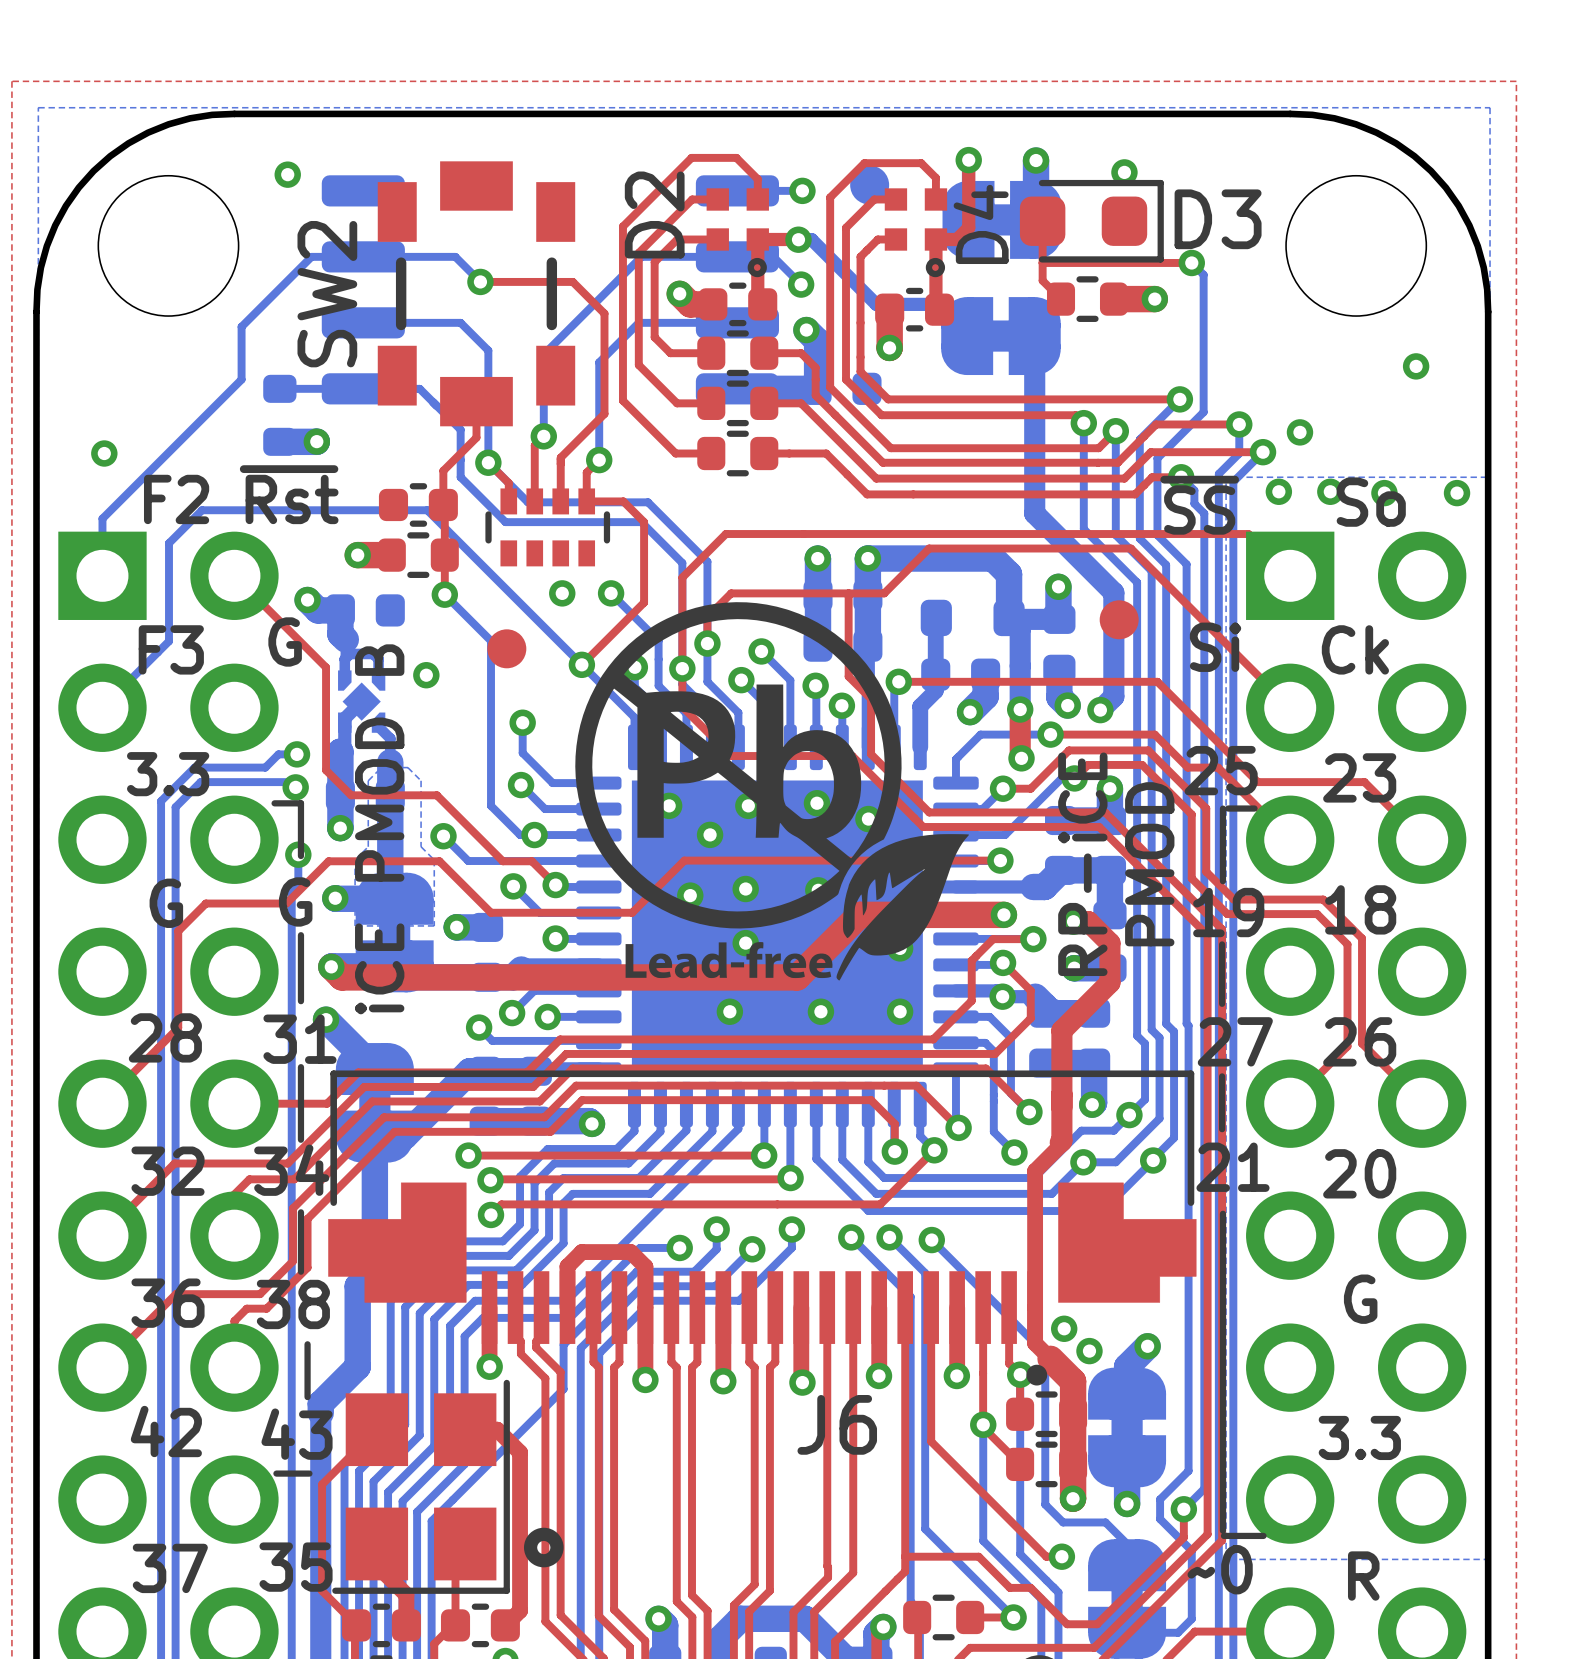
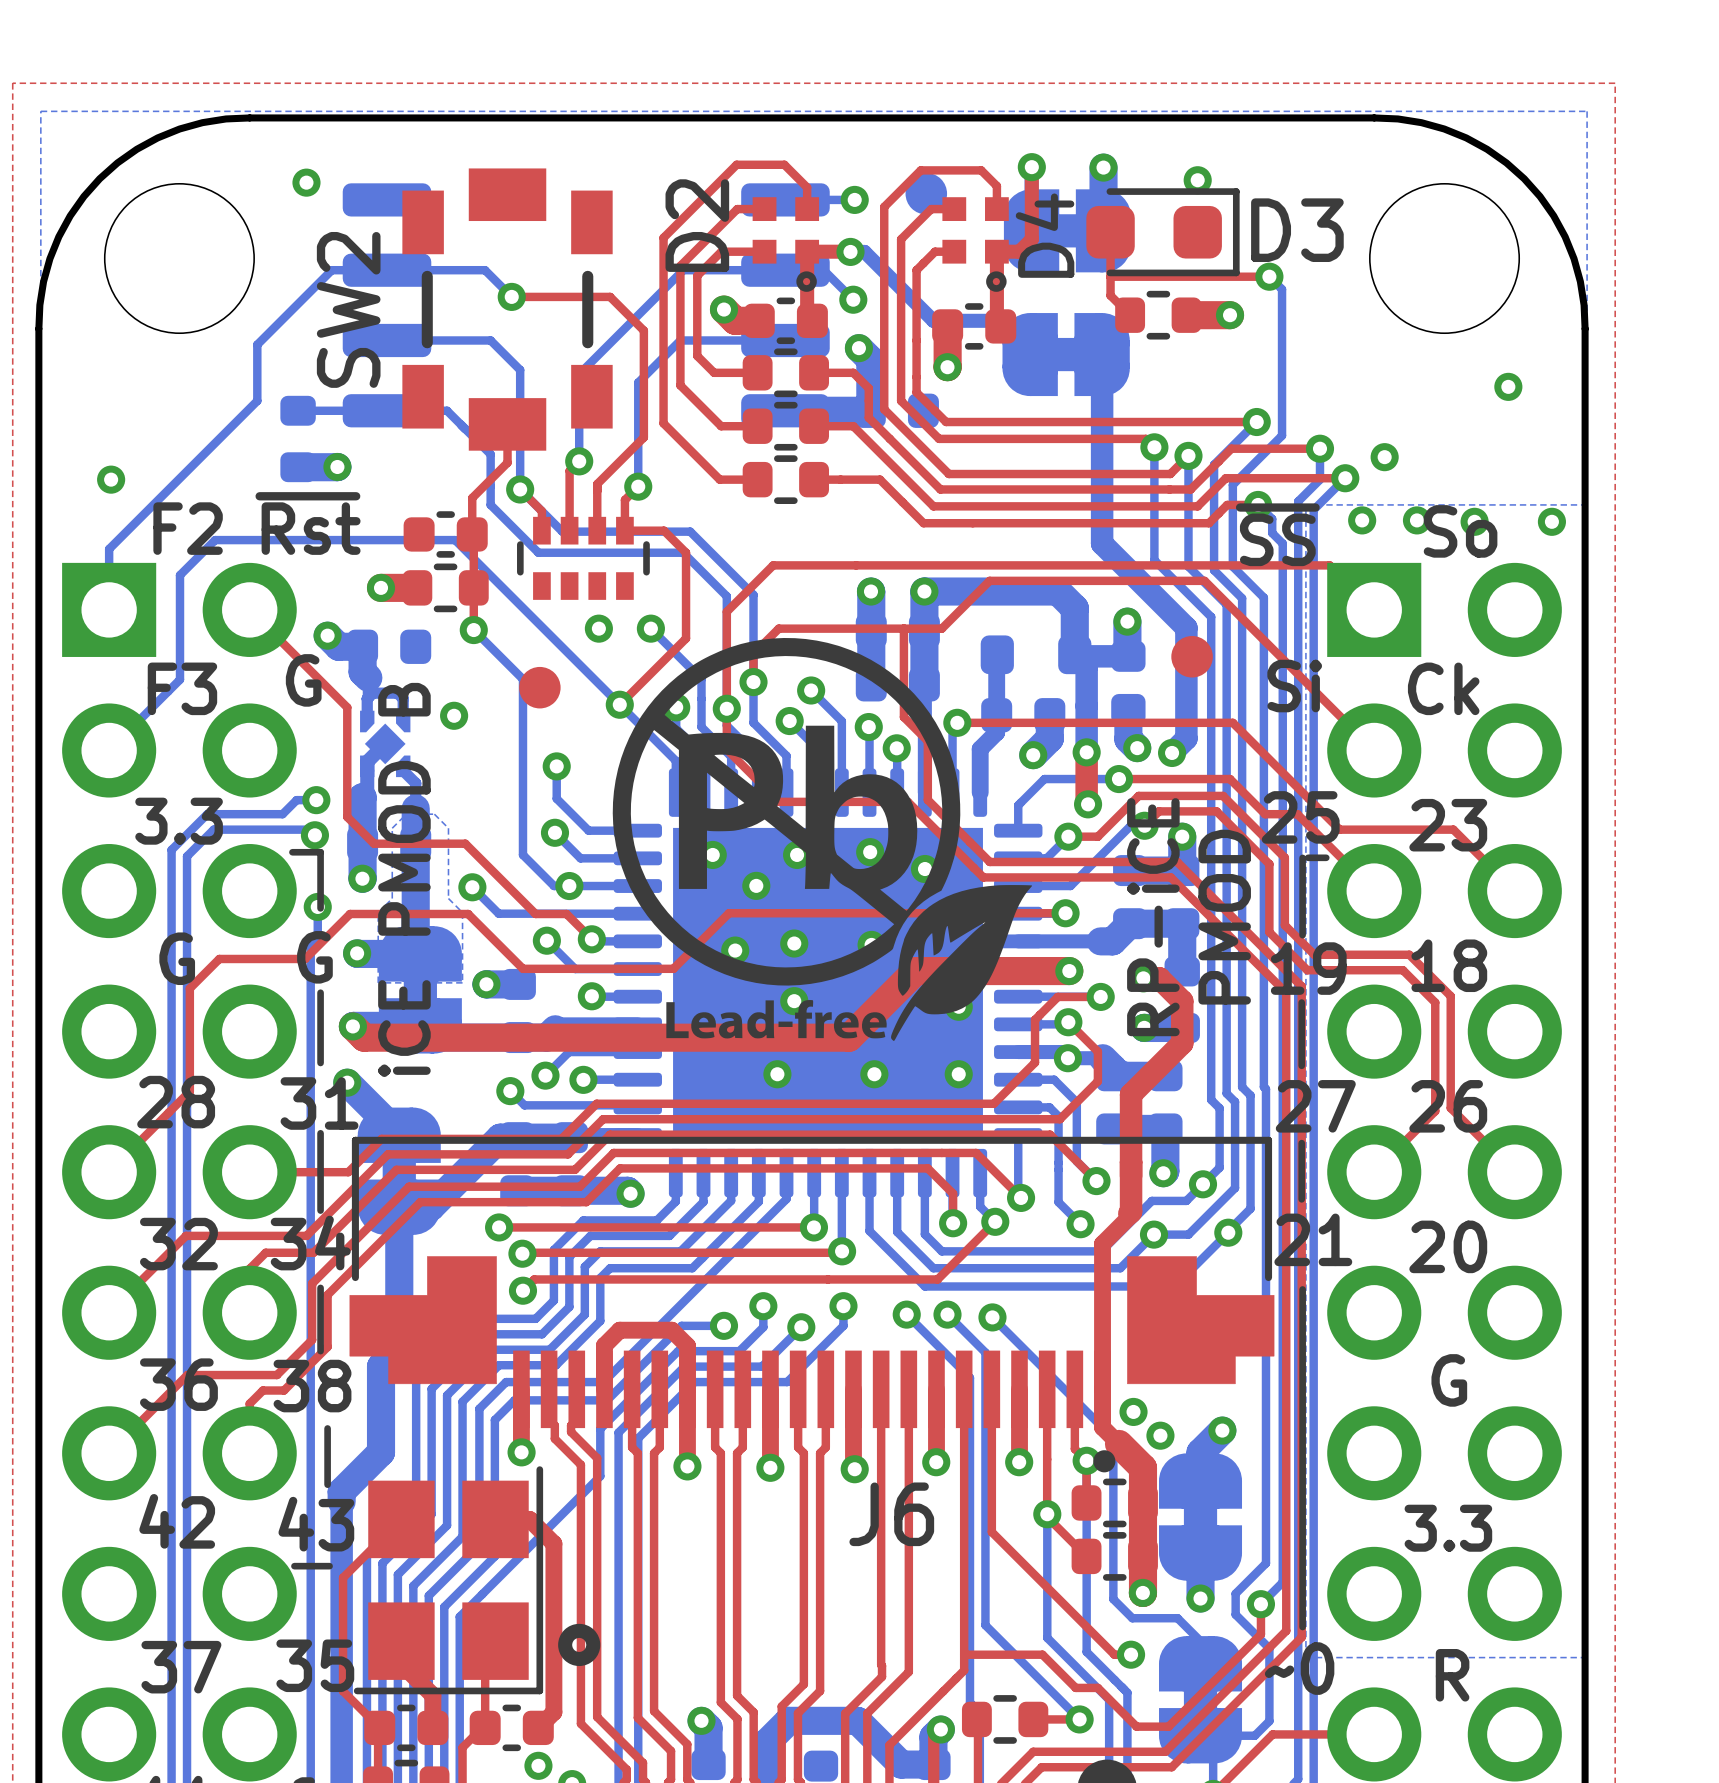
line: (1245, 808) (1254, 808) -> none
line: (1223, 1535) (1263, 1535) -> none

